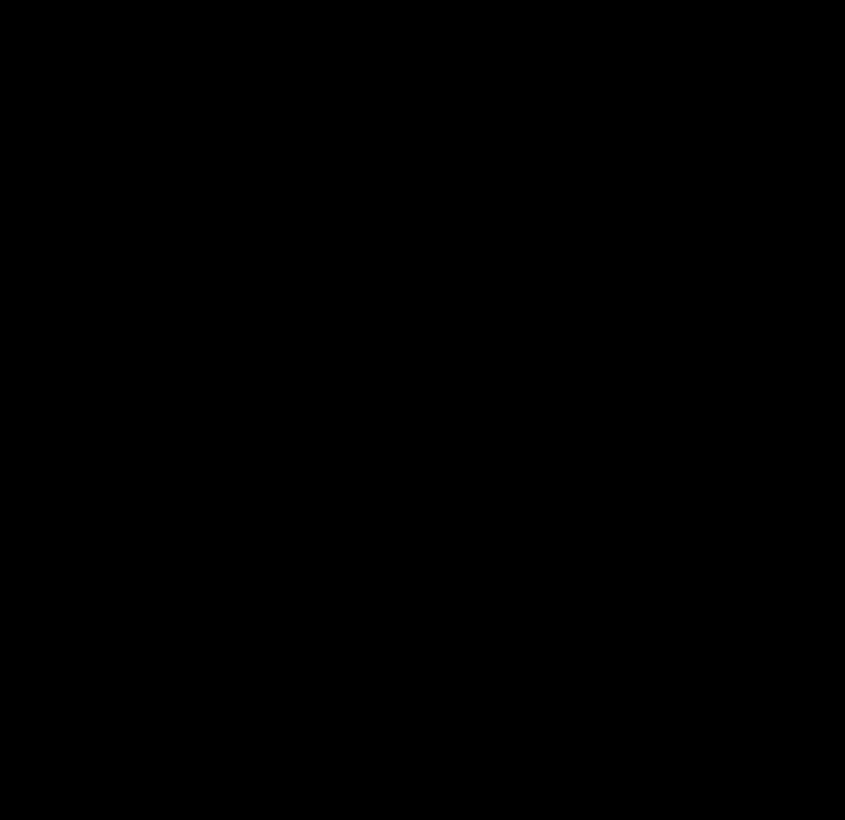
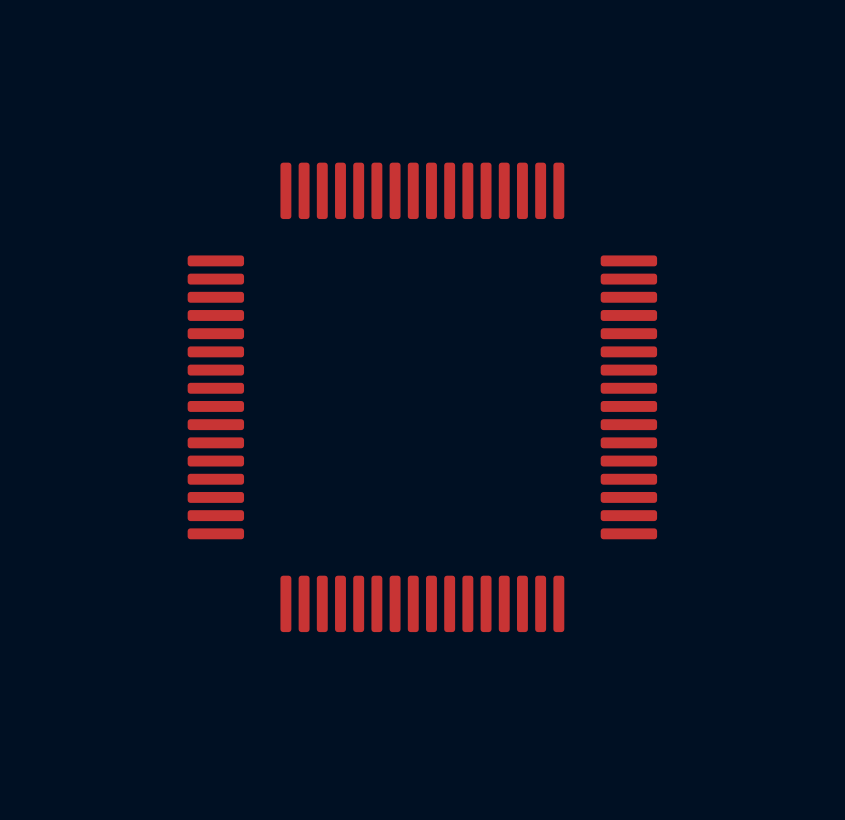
part: none -> (422, 397)

